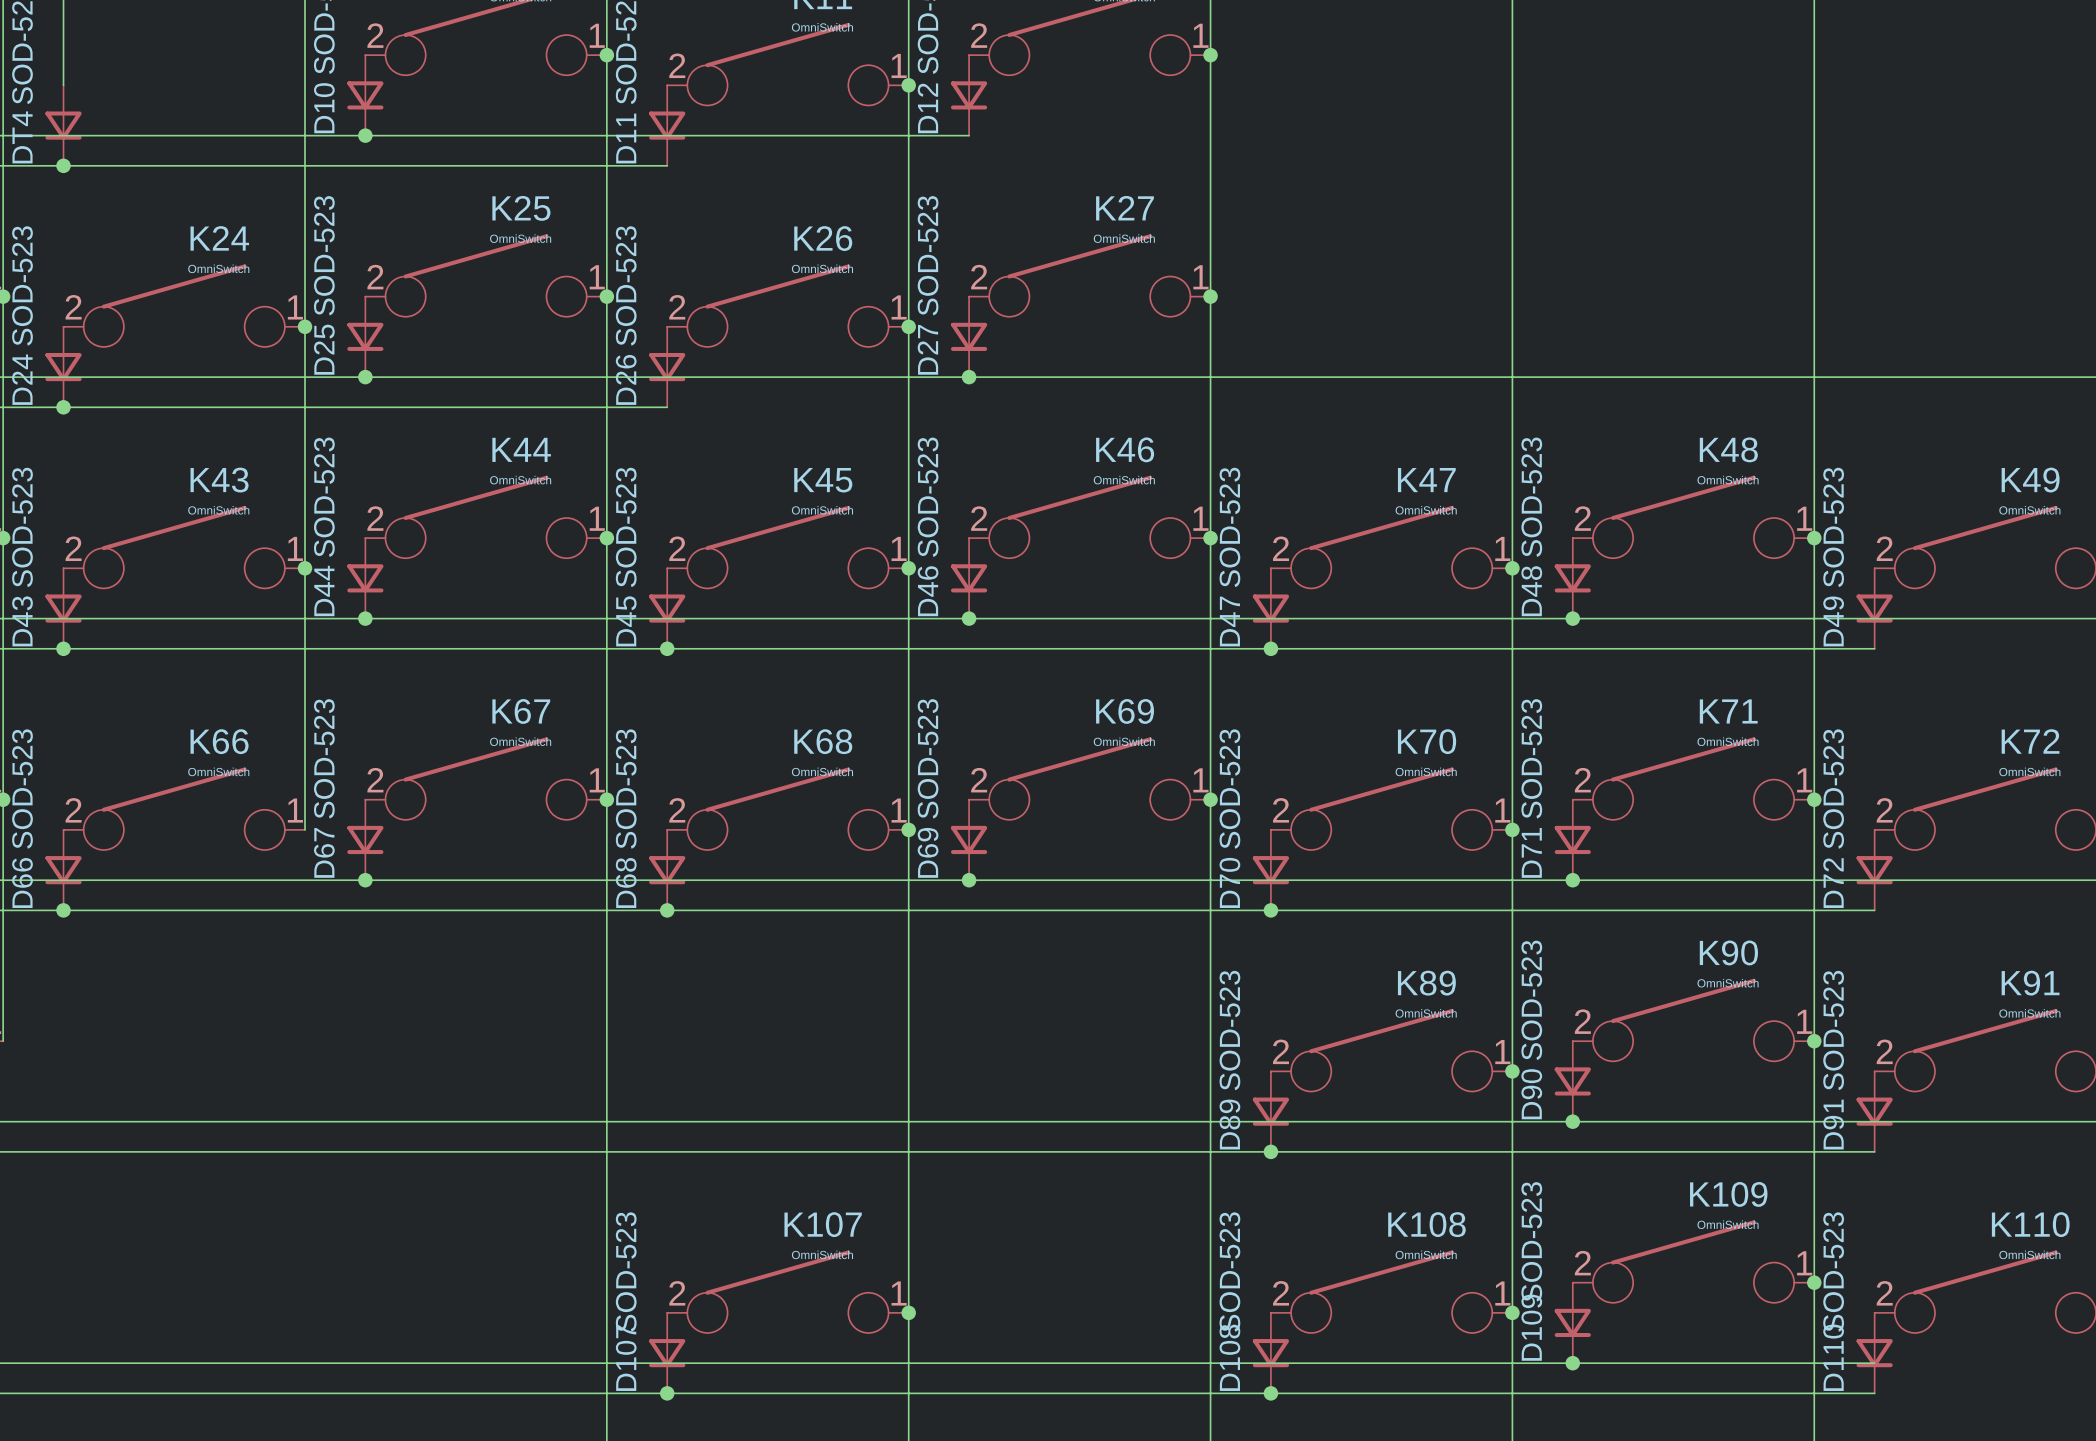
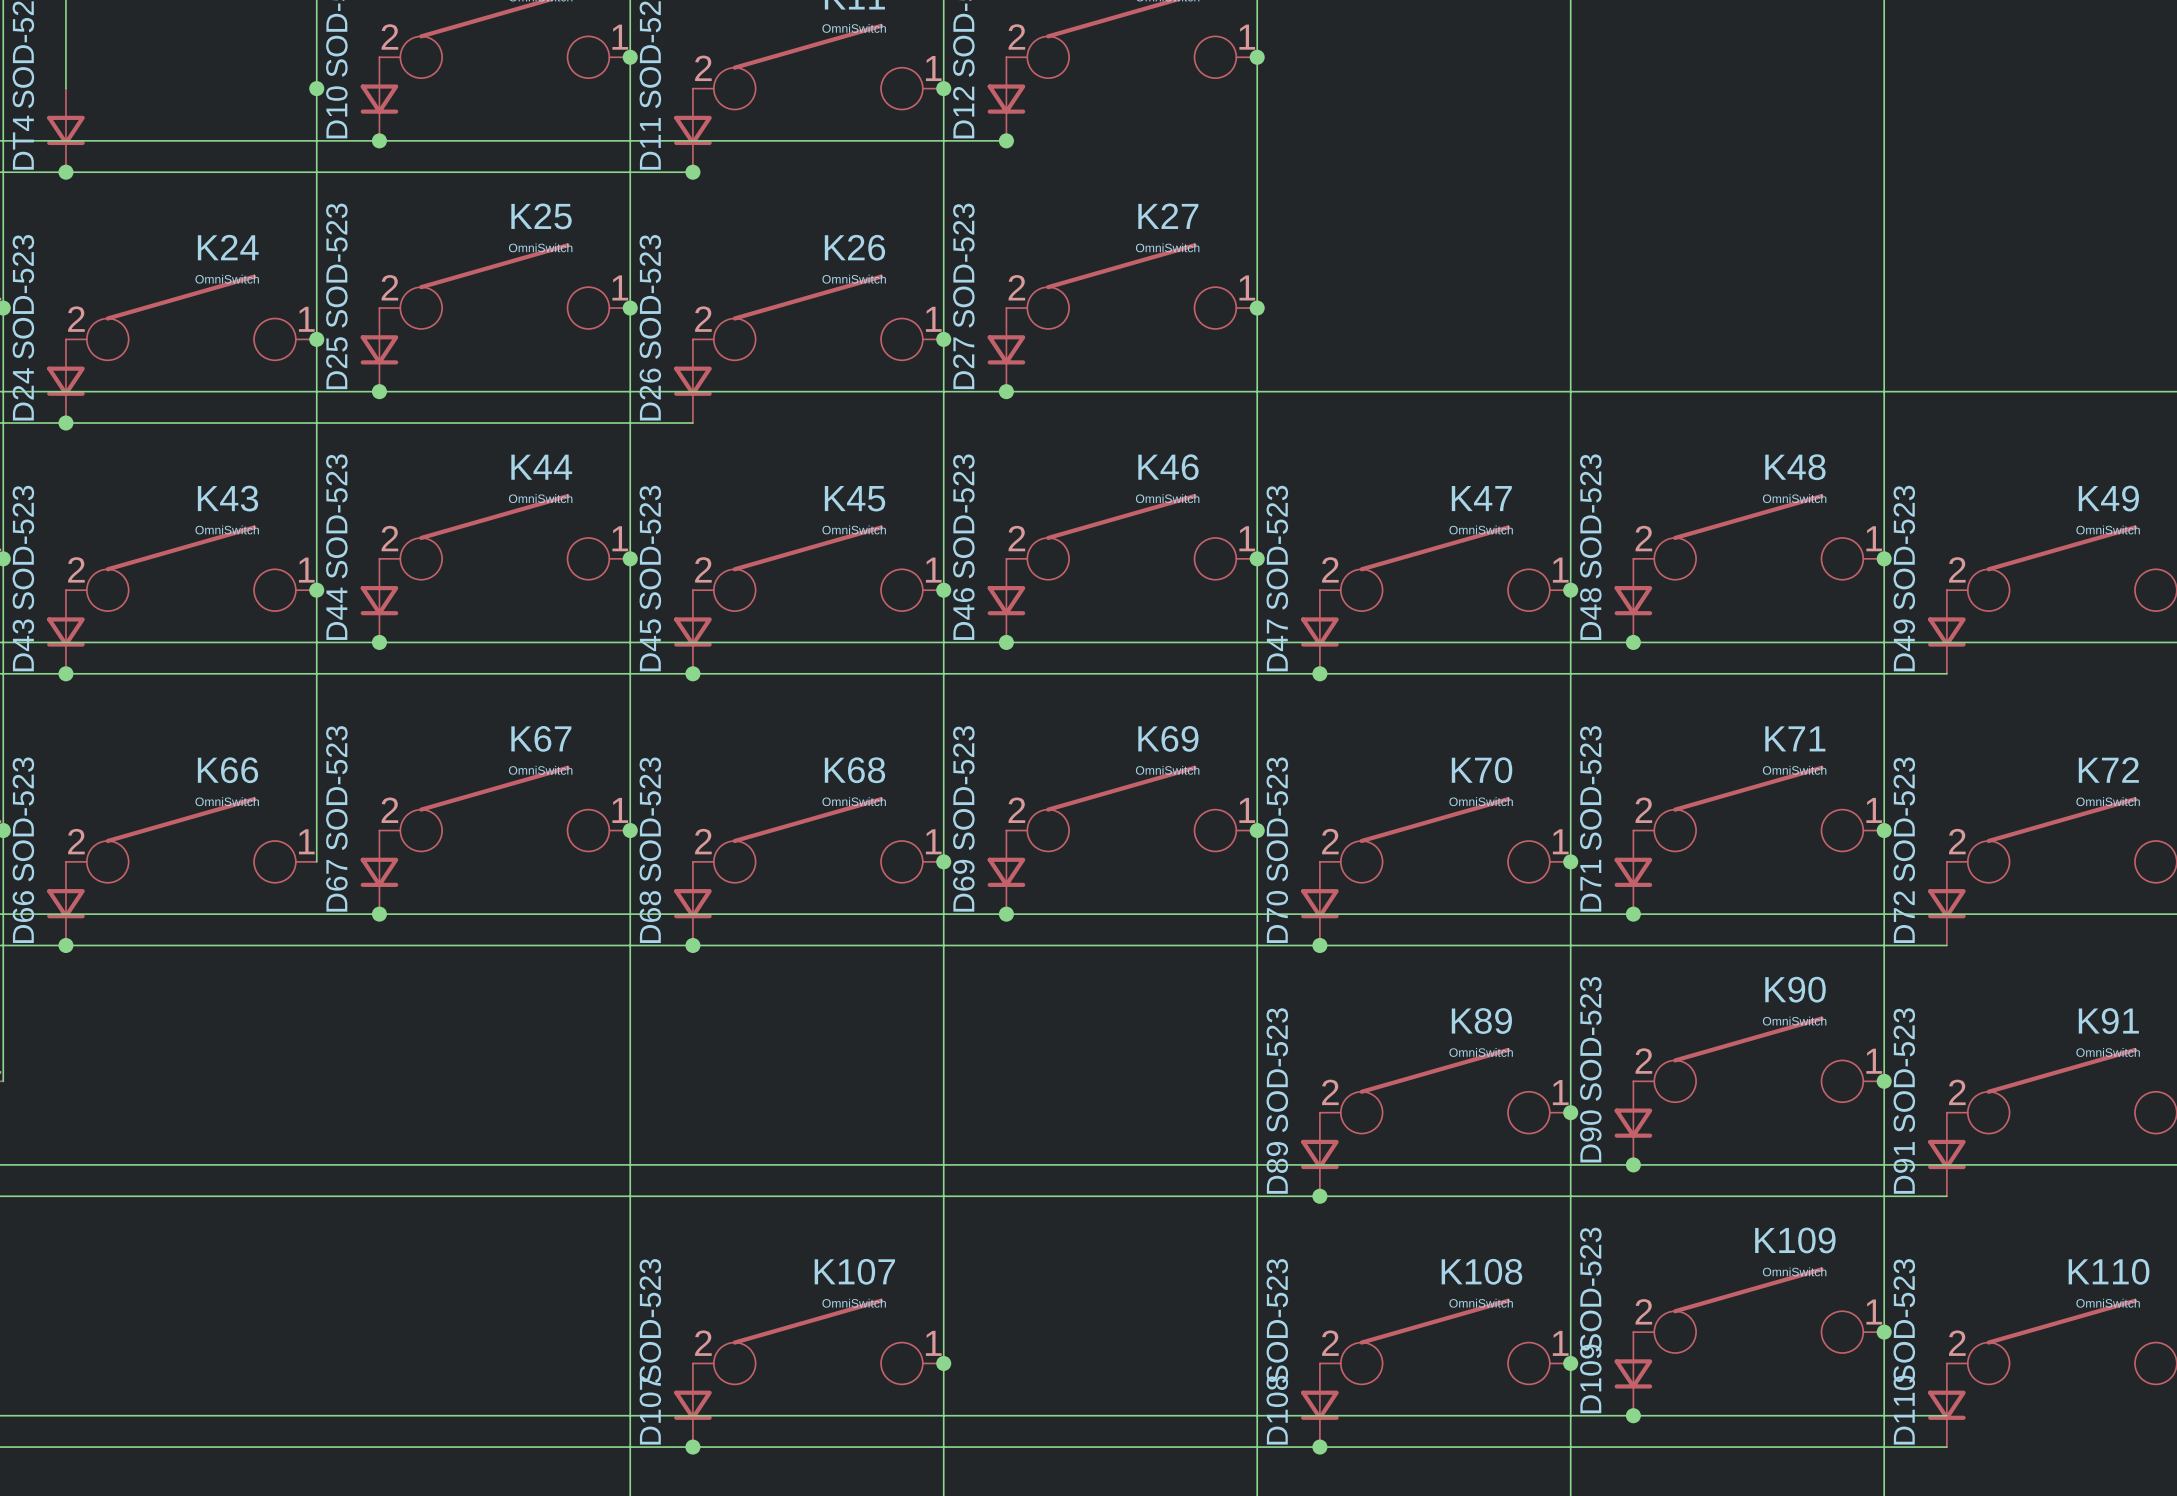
junction: none -> (316, 88)
junction: none -> (1006, 140)
junction: none -> (692, 172)

